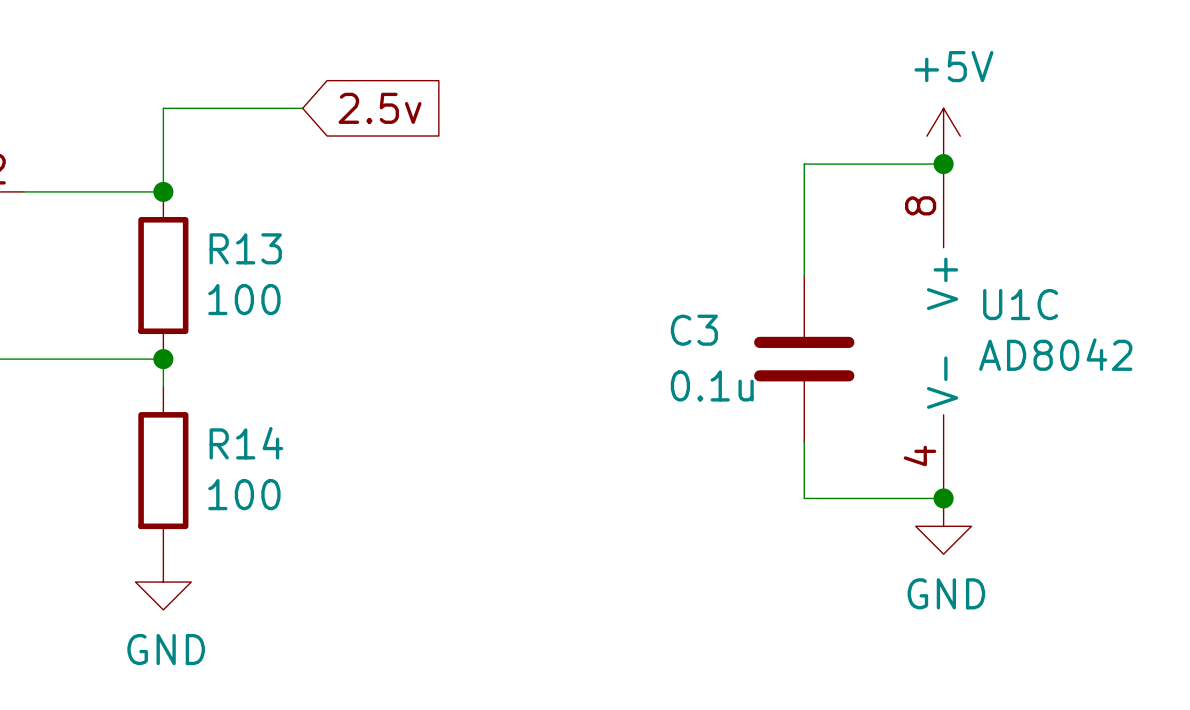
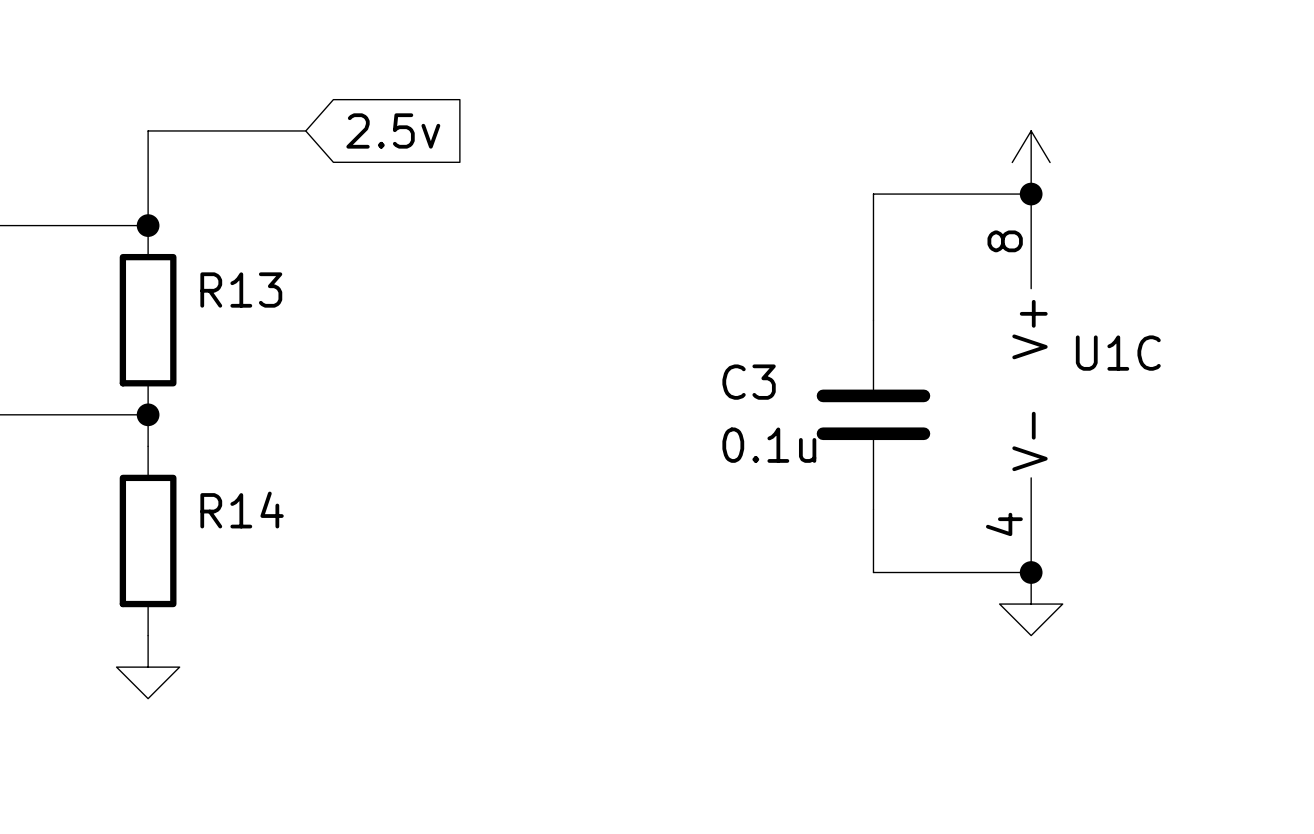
power symbol text: +5V (953, 66) -> none
R13 value: 100 (244, 299) -> none
U1C value: AD8042 (1055, 354) -> none
R14 value: 100 (244, 494) -> none
power symbol text: GND (946, 593) -> none
power symbol text: GND (166, 649) -> none

